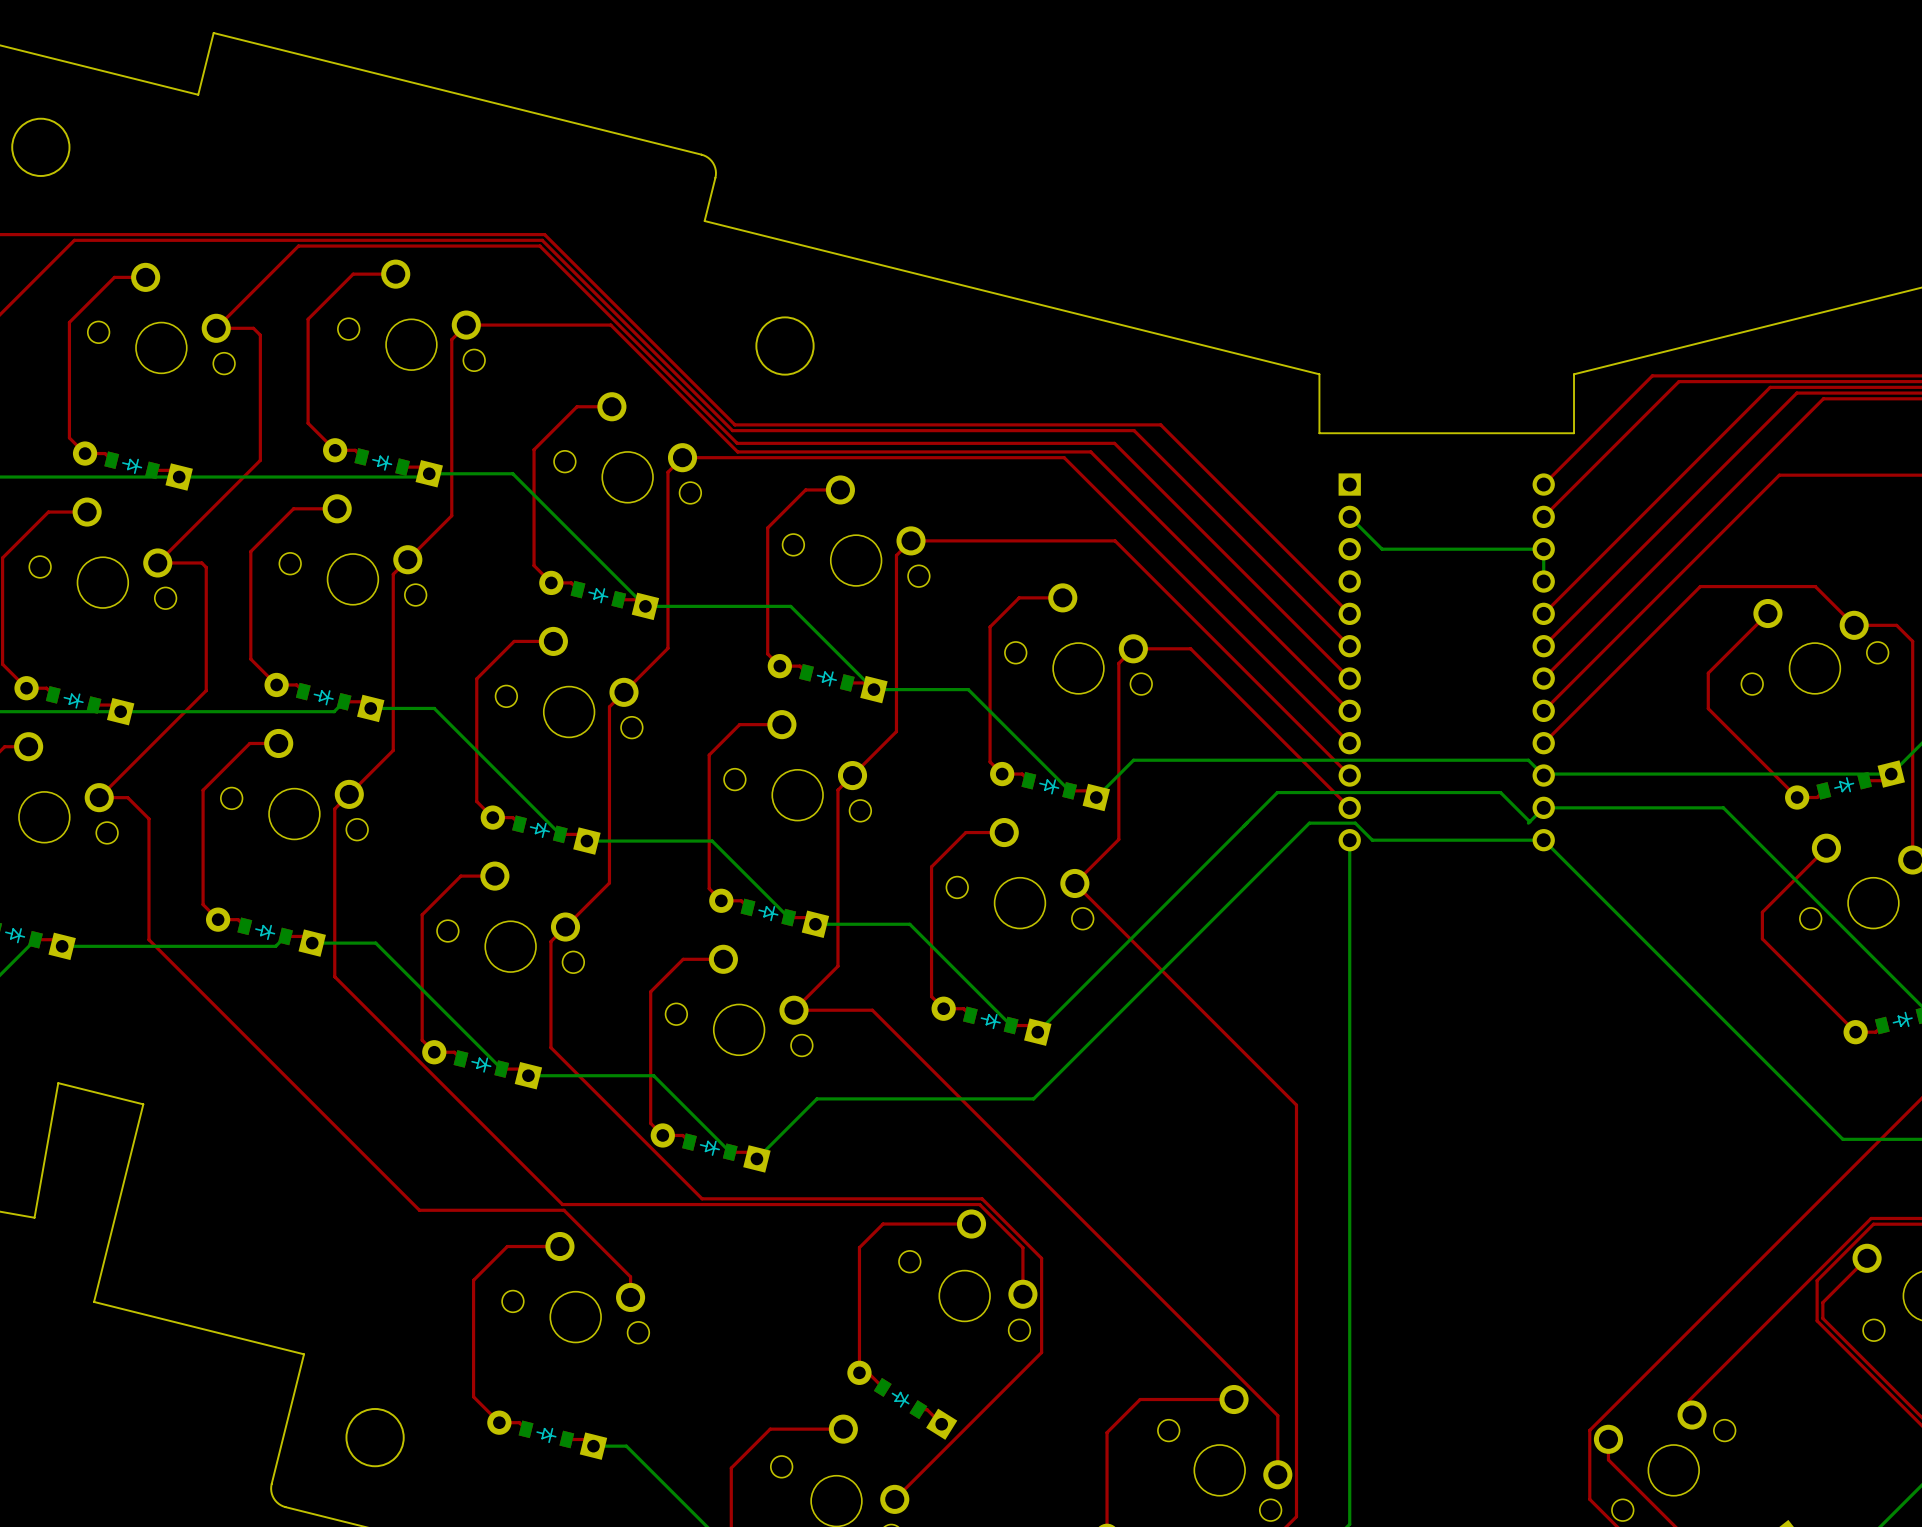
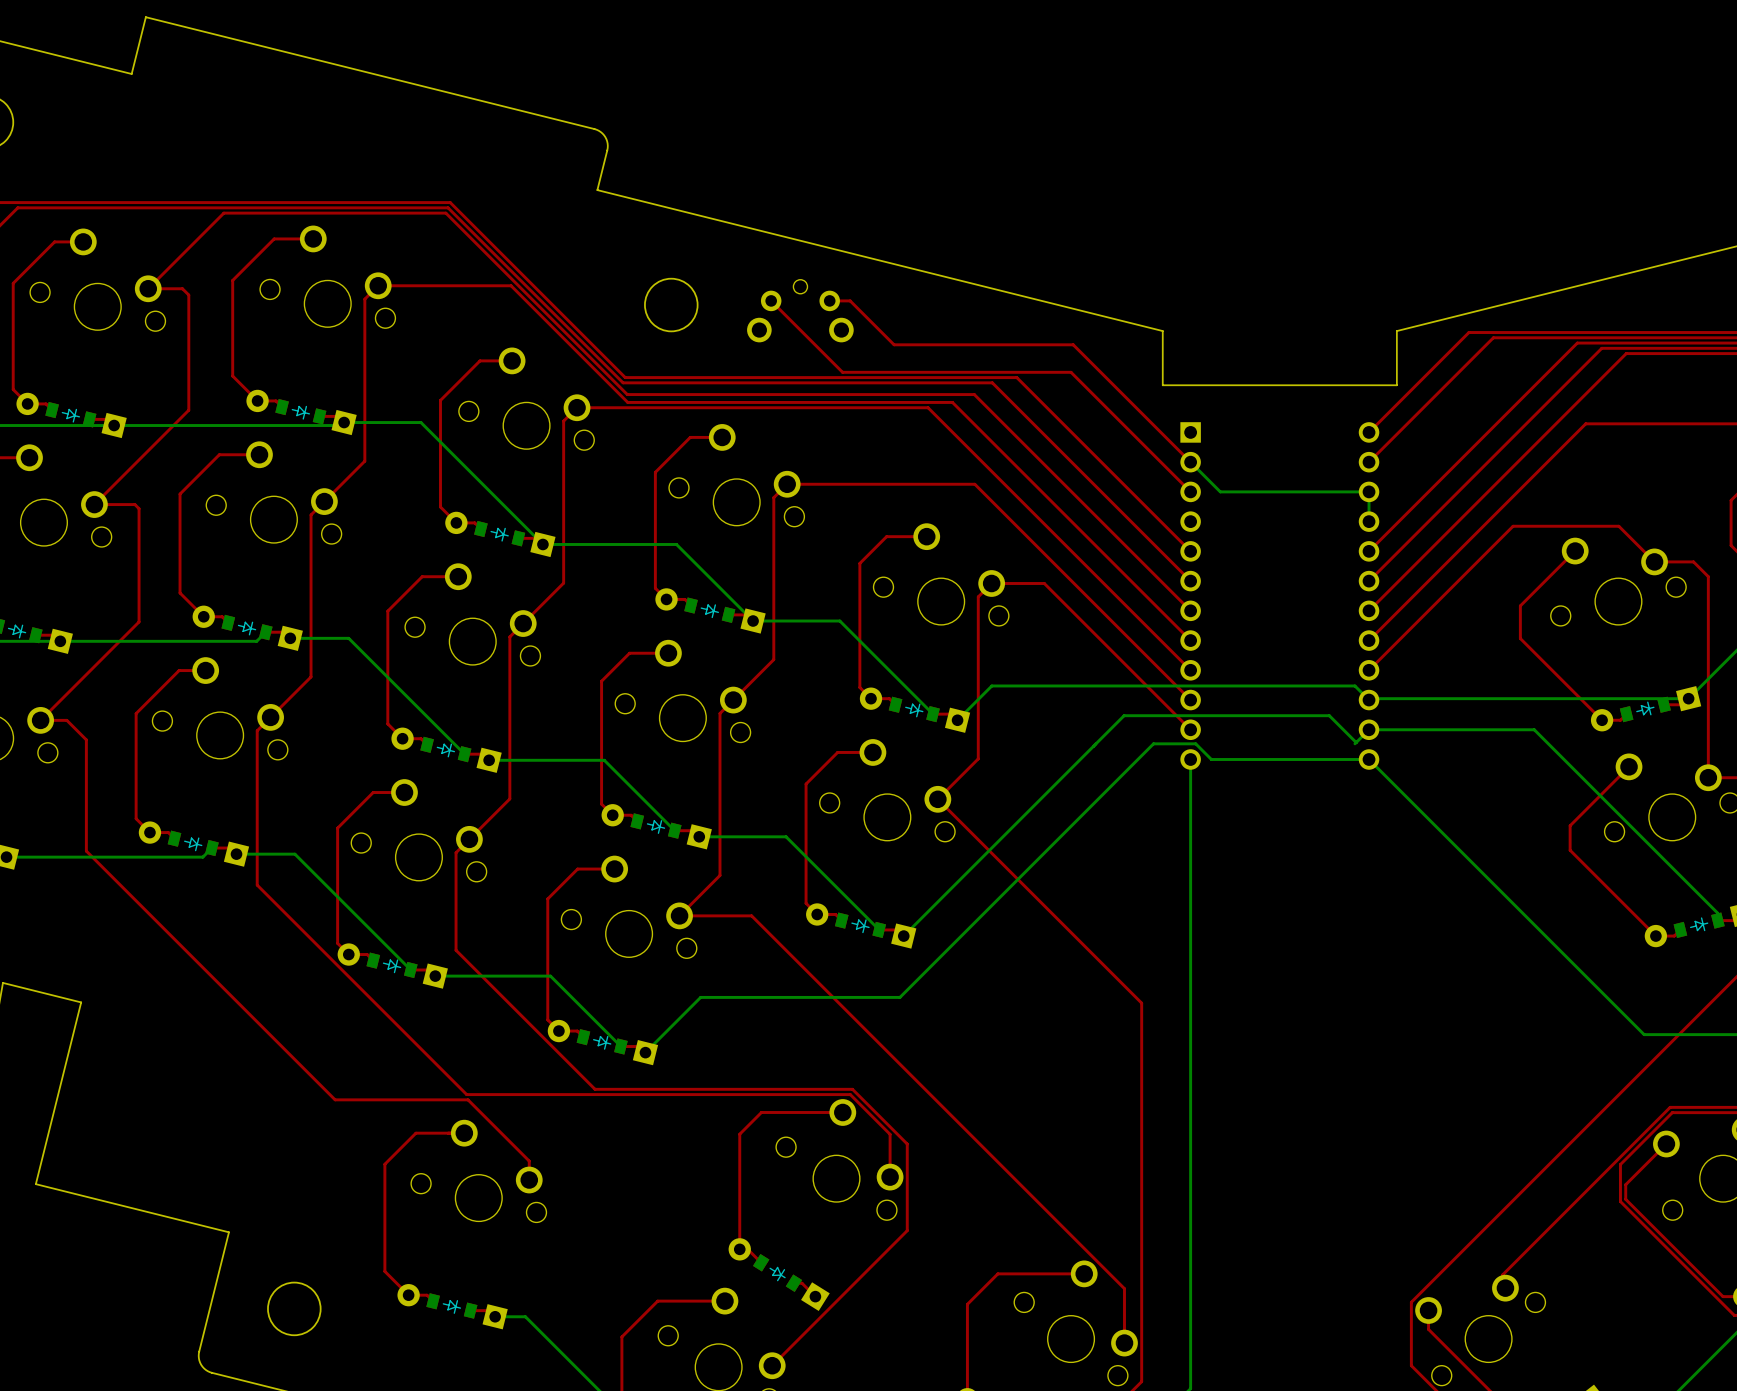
top track: none -> (771, 300) (842, 372) (1071, 372) (1190, 491)
top track: none -> (829, 300) (850, 300) (894, 344) (1073, 344) (1190, 462)
part: none -> (800, 311)

